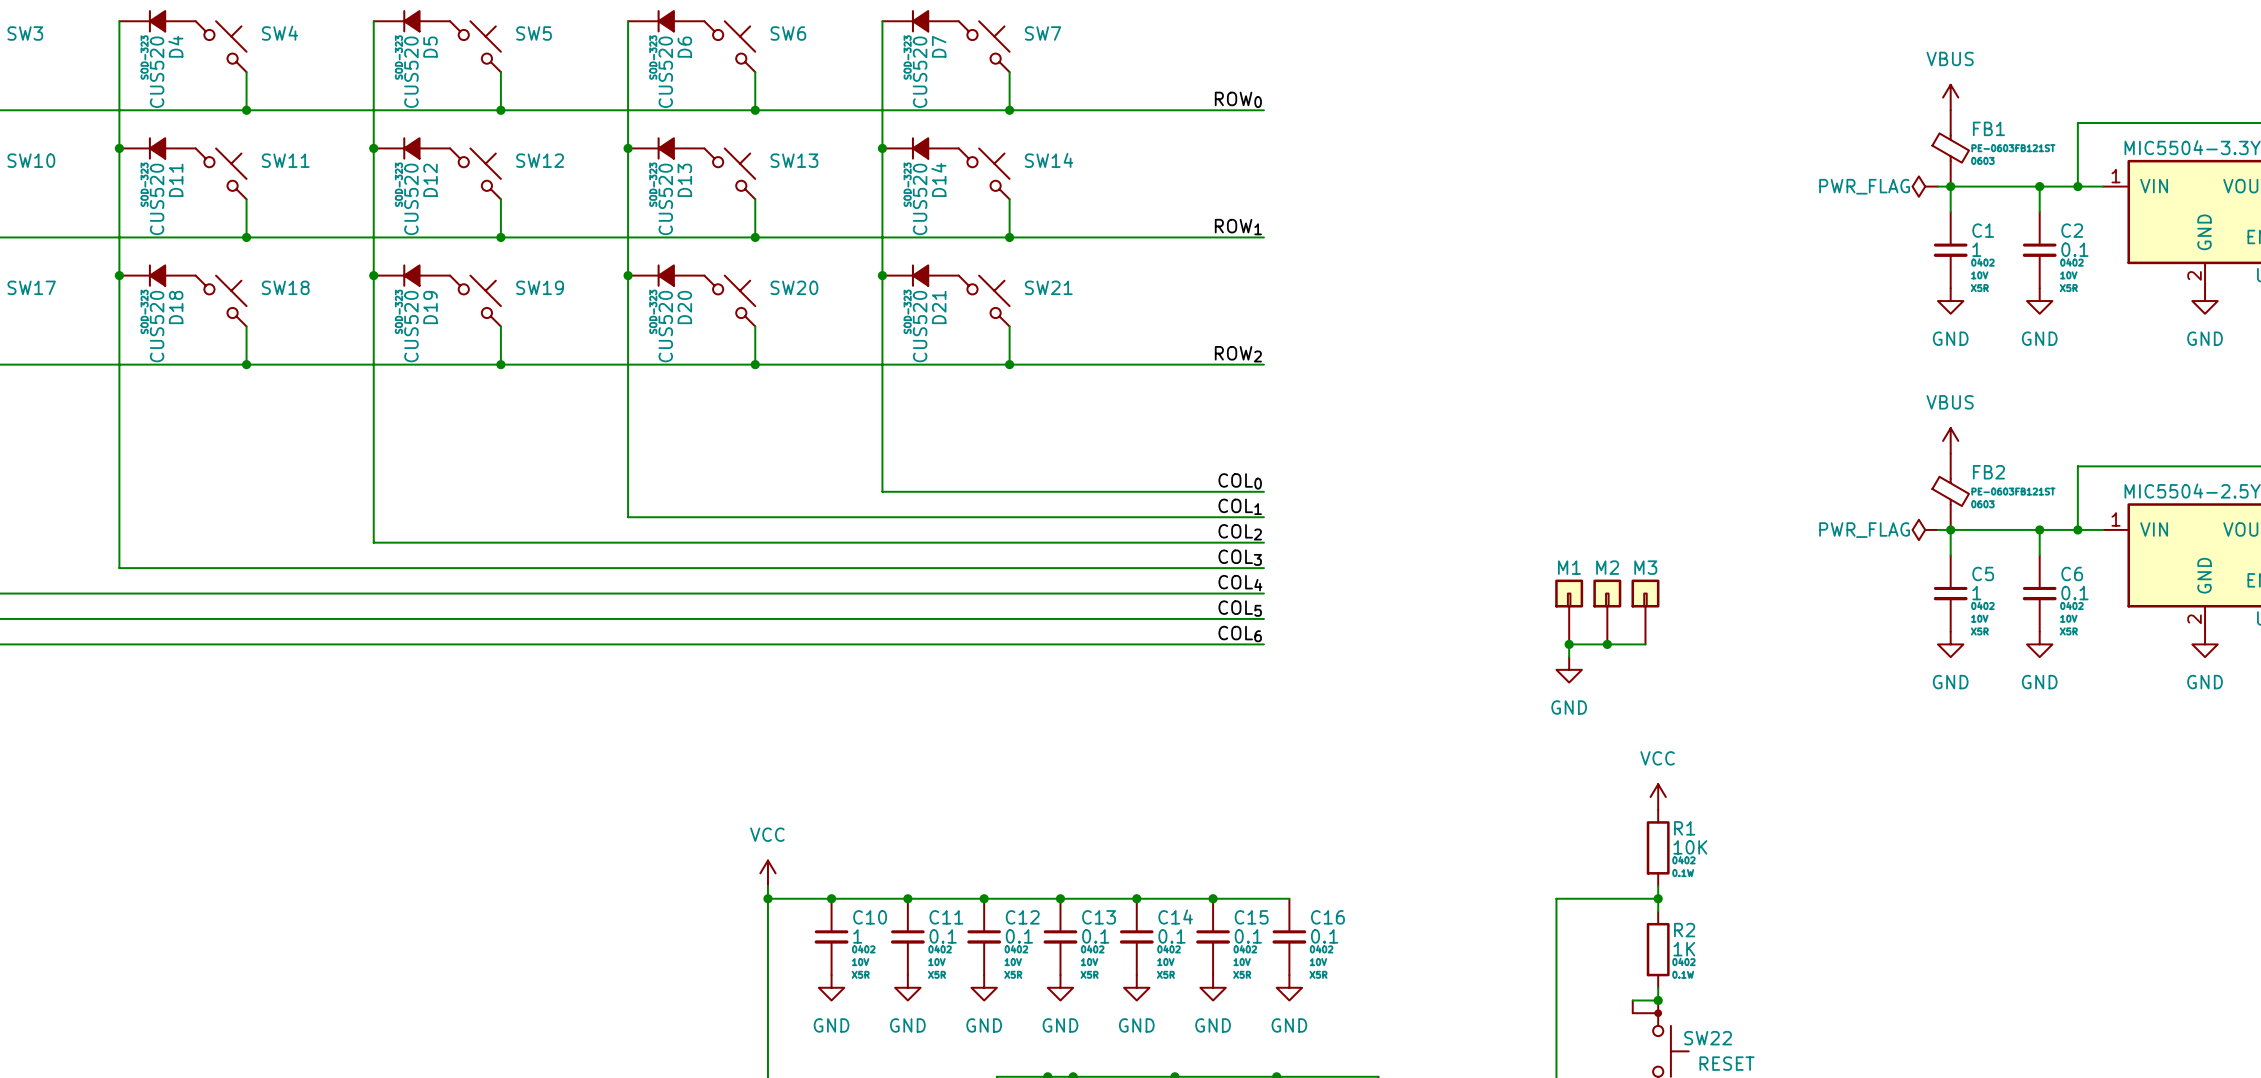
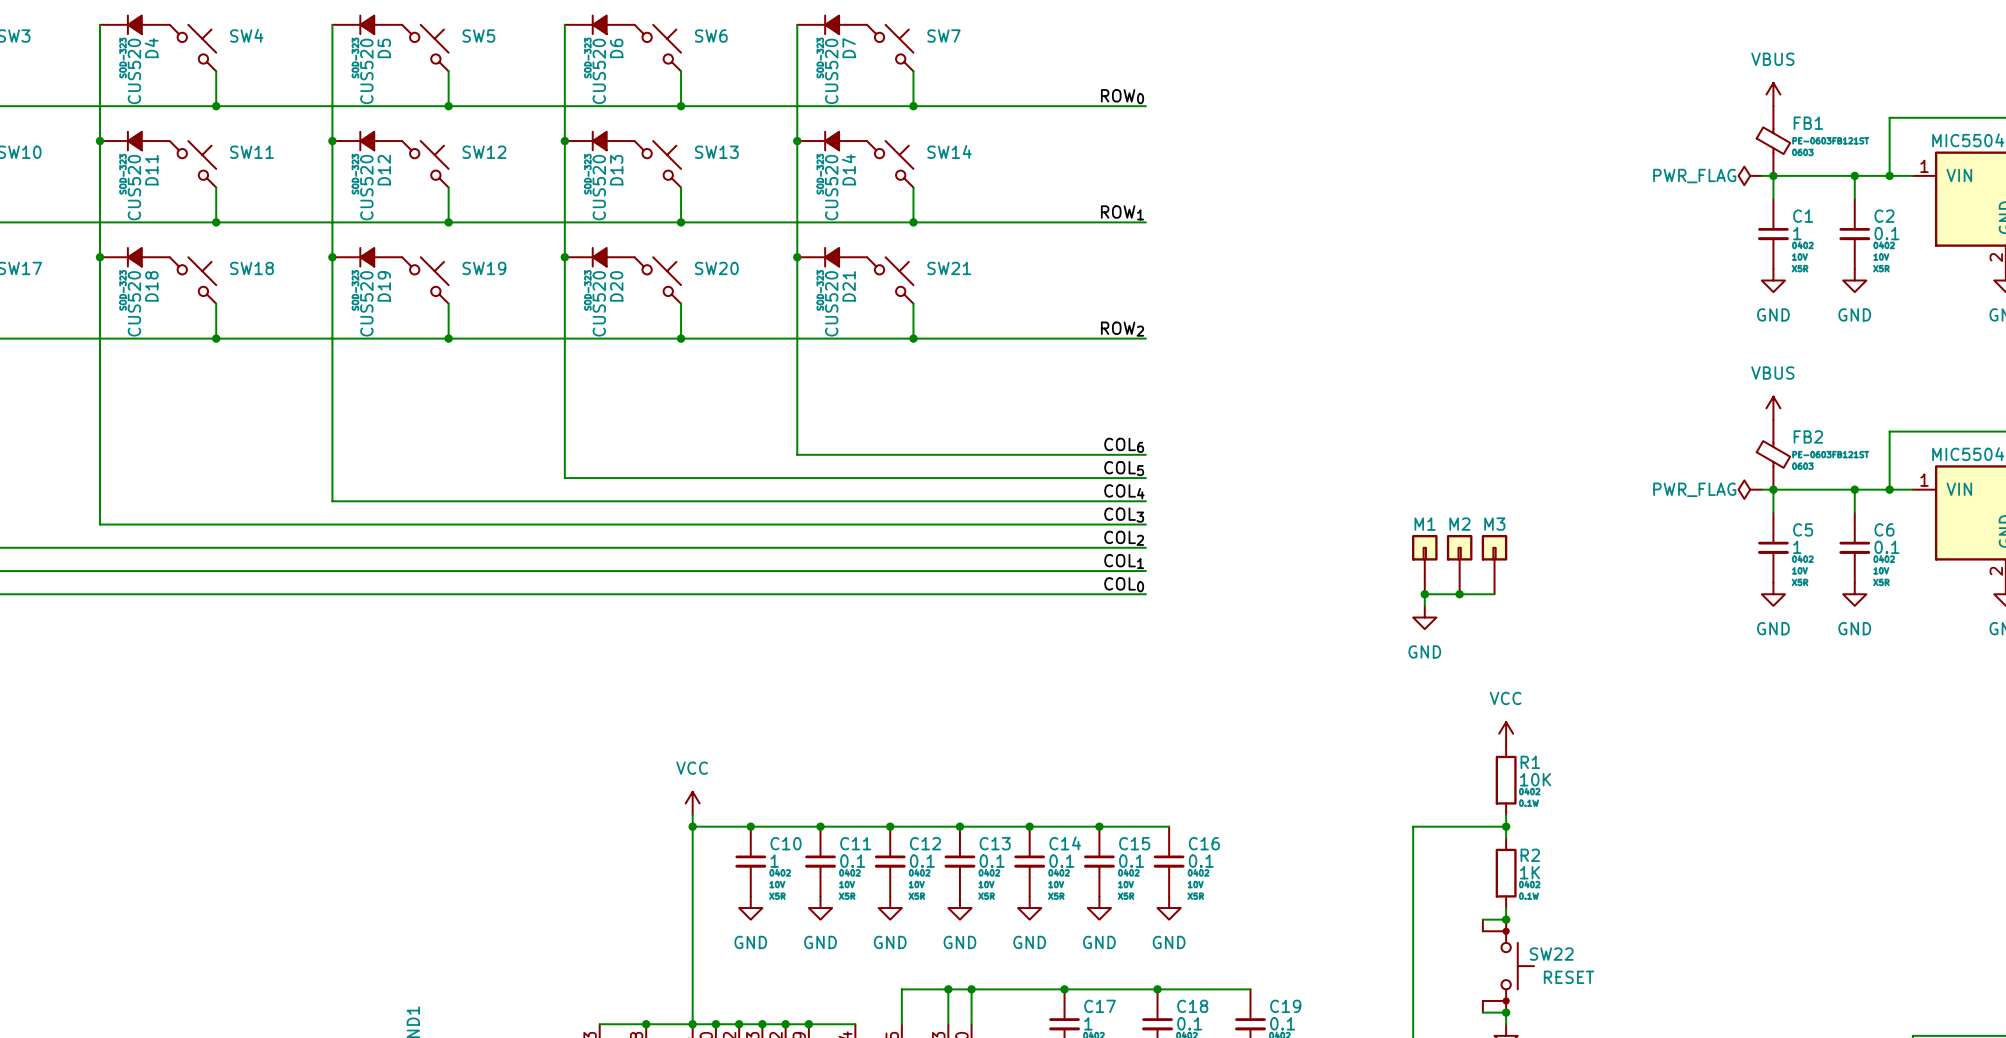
label: COL0 (1240, 481) -> COL6 (1124, 445)
label: COL1 (1240, 506) -> COL5 (1124, 468)
label: COL2 (1240, 532) -> COL4 (1124, 491)
label: COL4 (1240, 583) -> COL2 (1124, 538)
label: COL5 (1240, 608) -> COL1 (1124, 561)
label: COL6 (1240, 634) -> COL0 (1124, 584)

